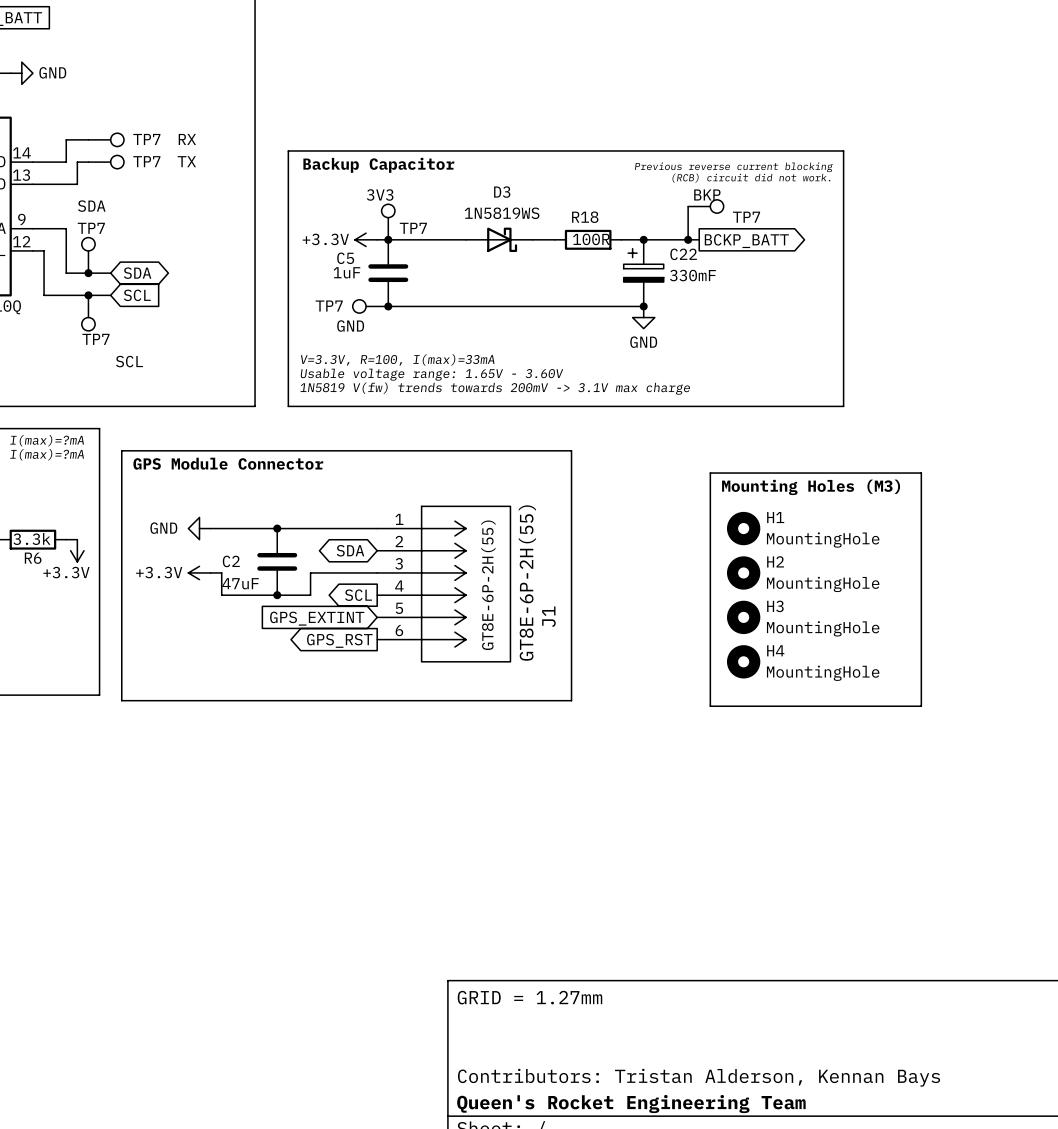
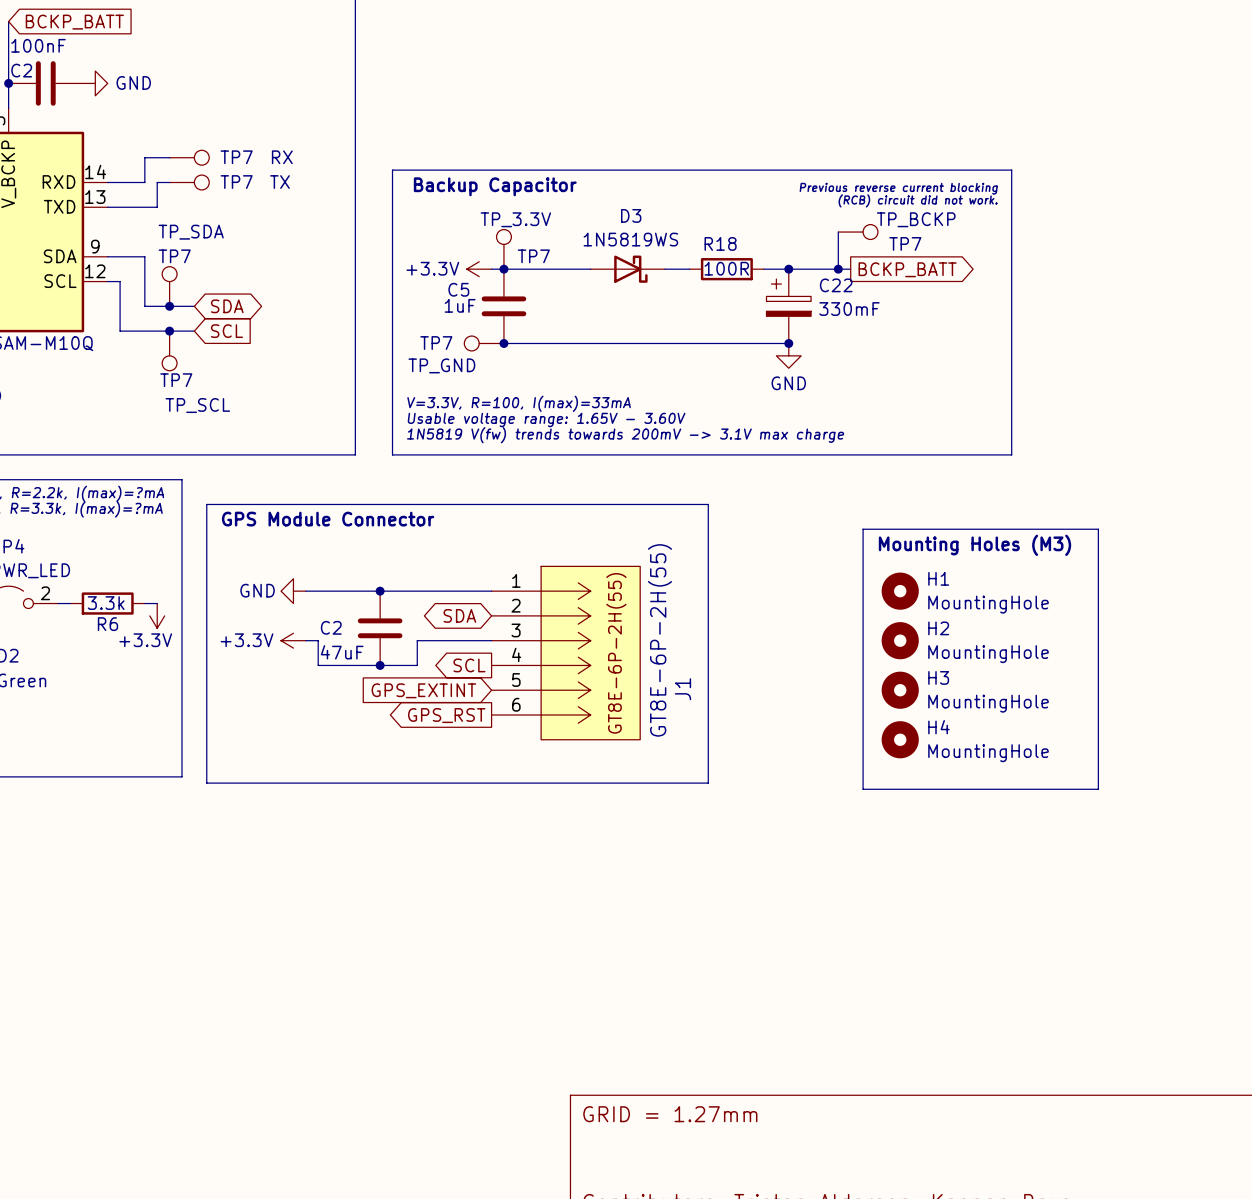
TP7 value: 3V3 (380, 194) -> TP_3.3V (515, 219)
TP7 value: BKP (707, 194) -> TP_BCKP (916, 219)
TP7 value: SDA (91, 206) -> TP_SDA (191, 232)
TP7 value: GND (350, 326) -> TP_GND (441, 365)
TP7 value: SCL (129, 361) -> TP_SCL (197, 405)

